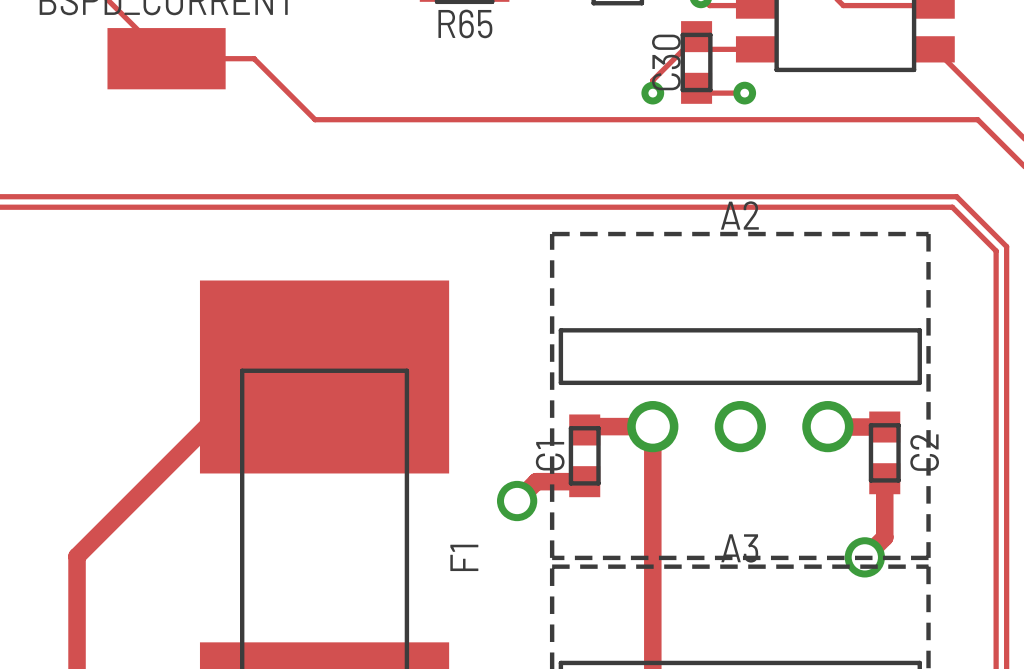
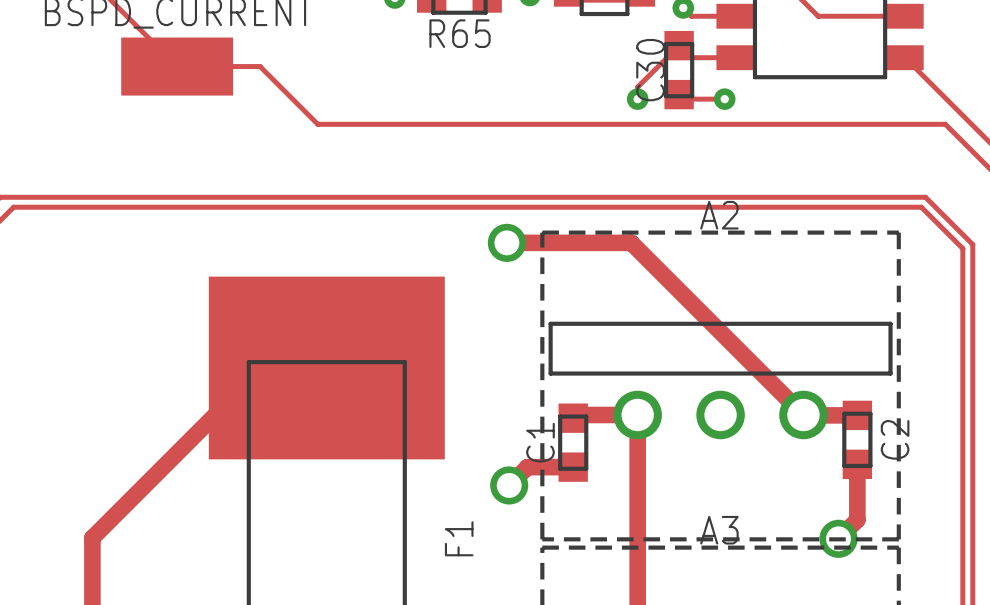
track: none -> (506, 242) (631, 242) (803, 414)
via: none -> (506, 242)

